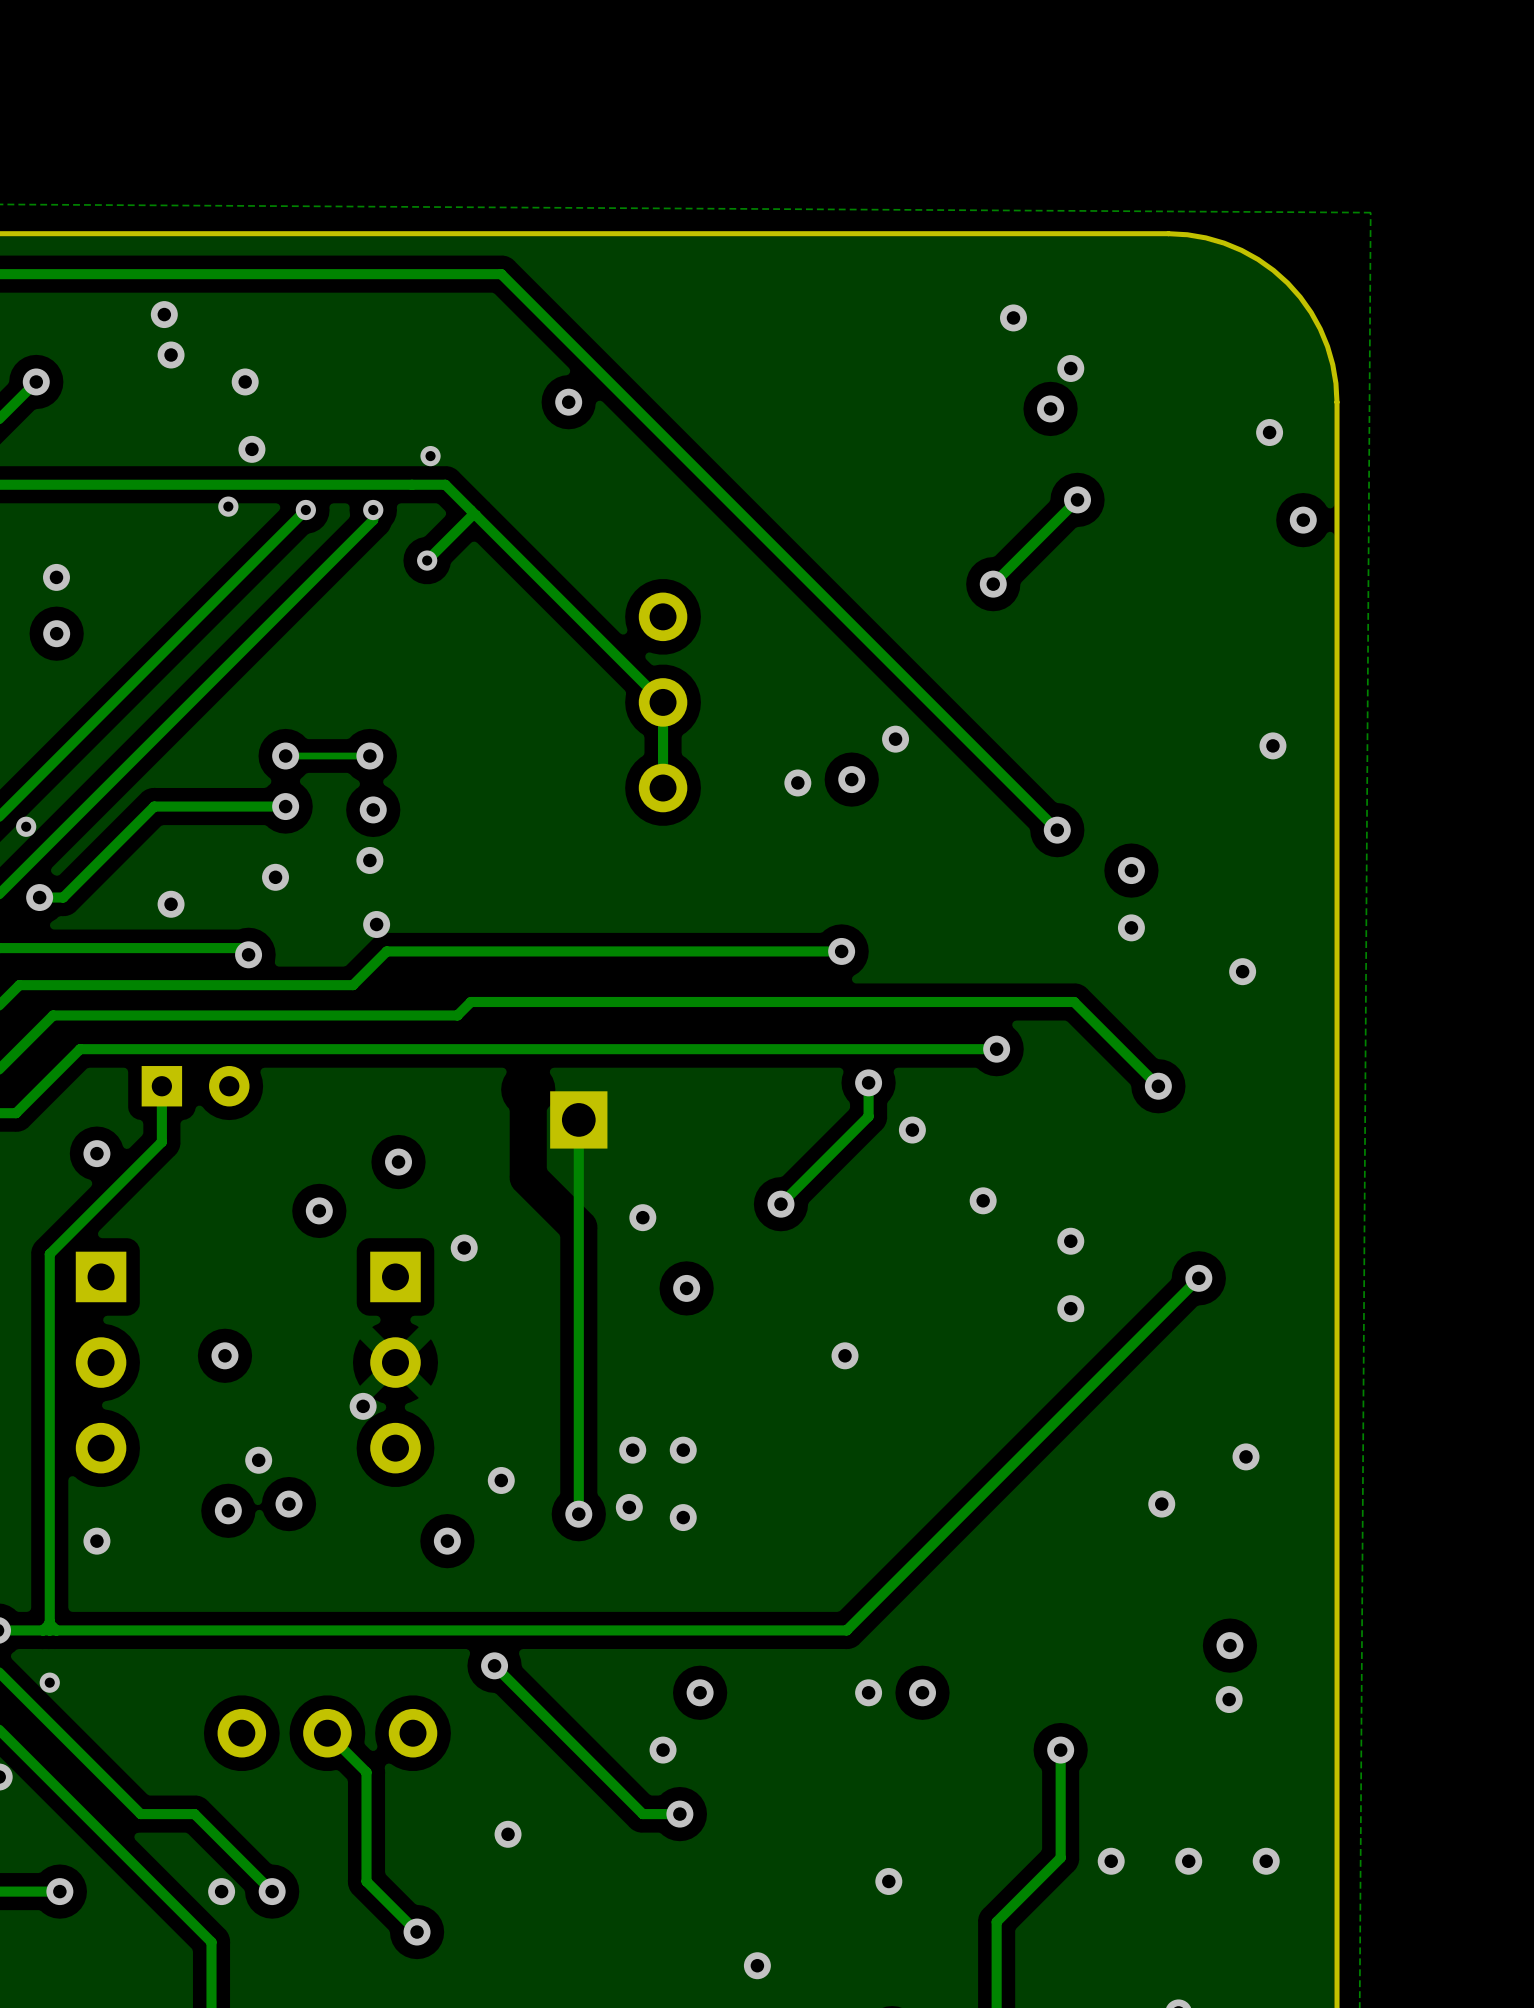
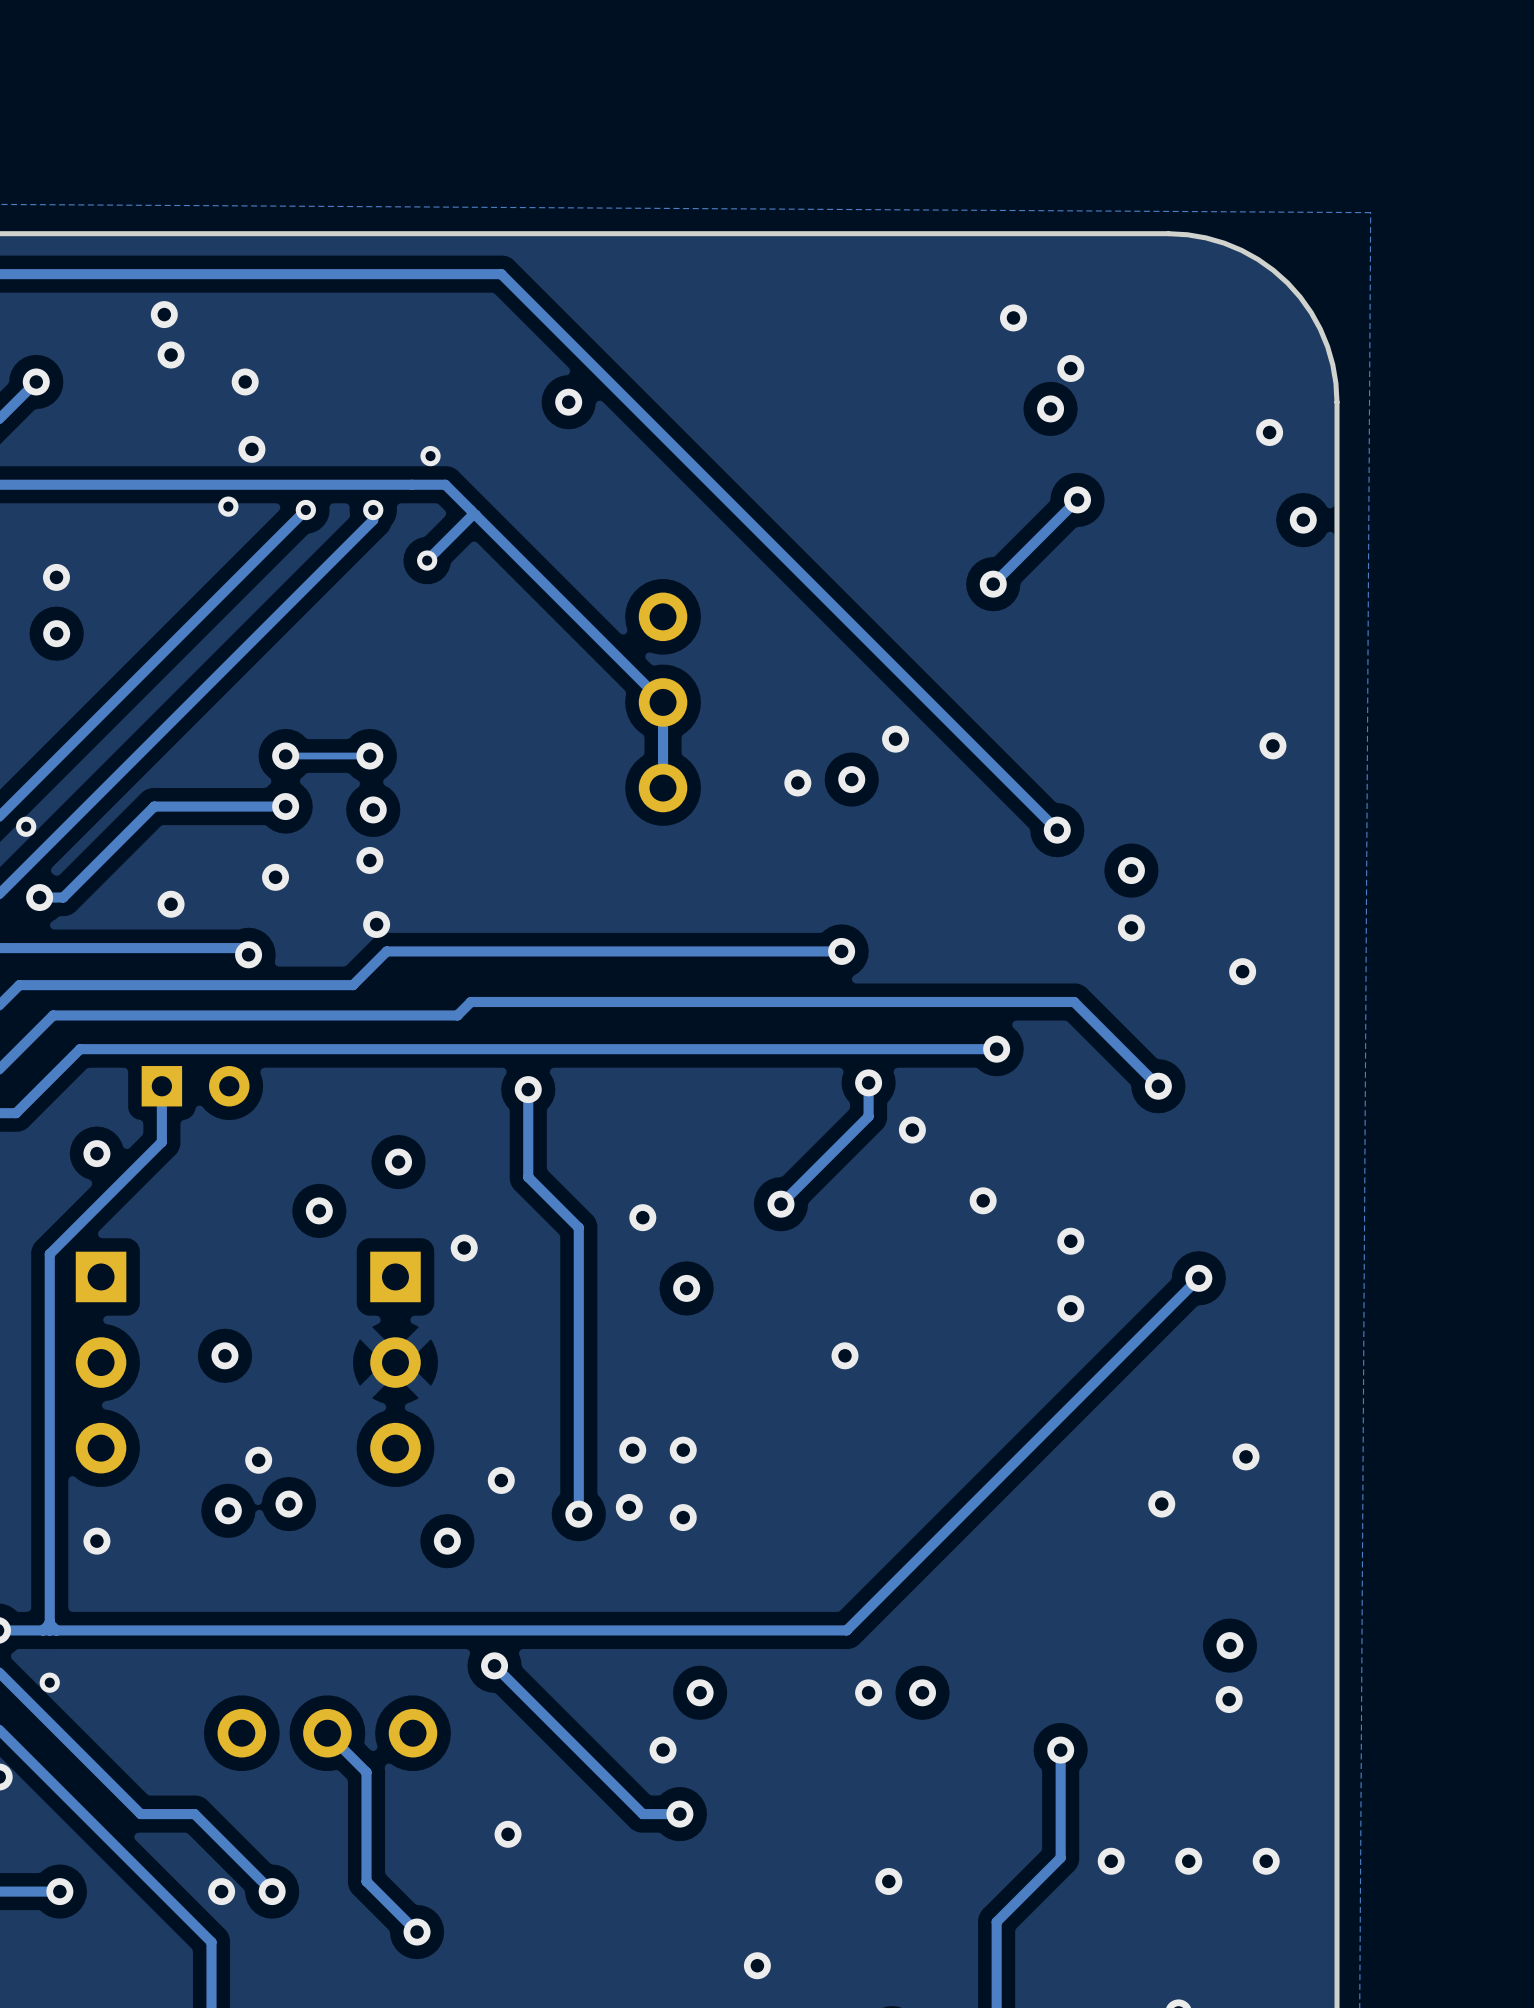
via: none -> (528, 1089)
track: (578, 1119) (578, 1227) -> (528, 1089) (528, 1177) (578, 1227)
part: (578, 1119) -> none
via: (363, 1406) -> none

